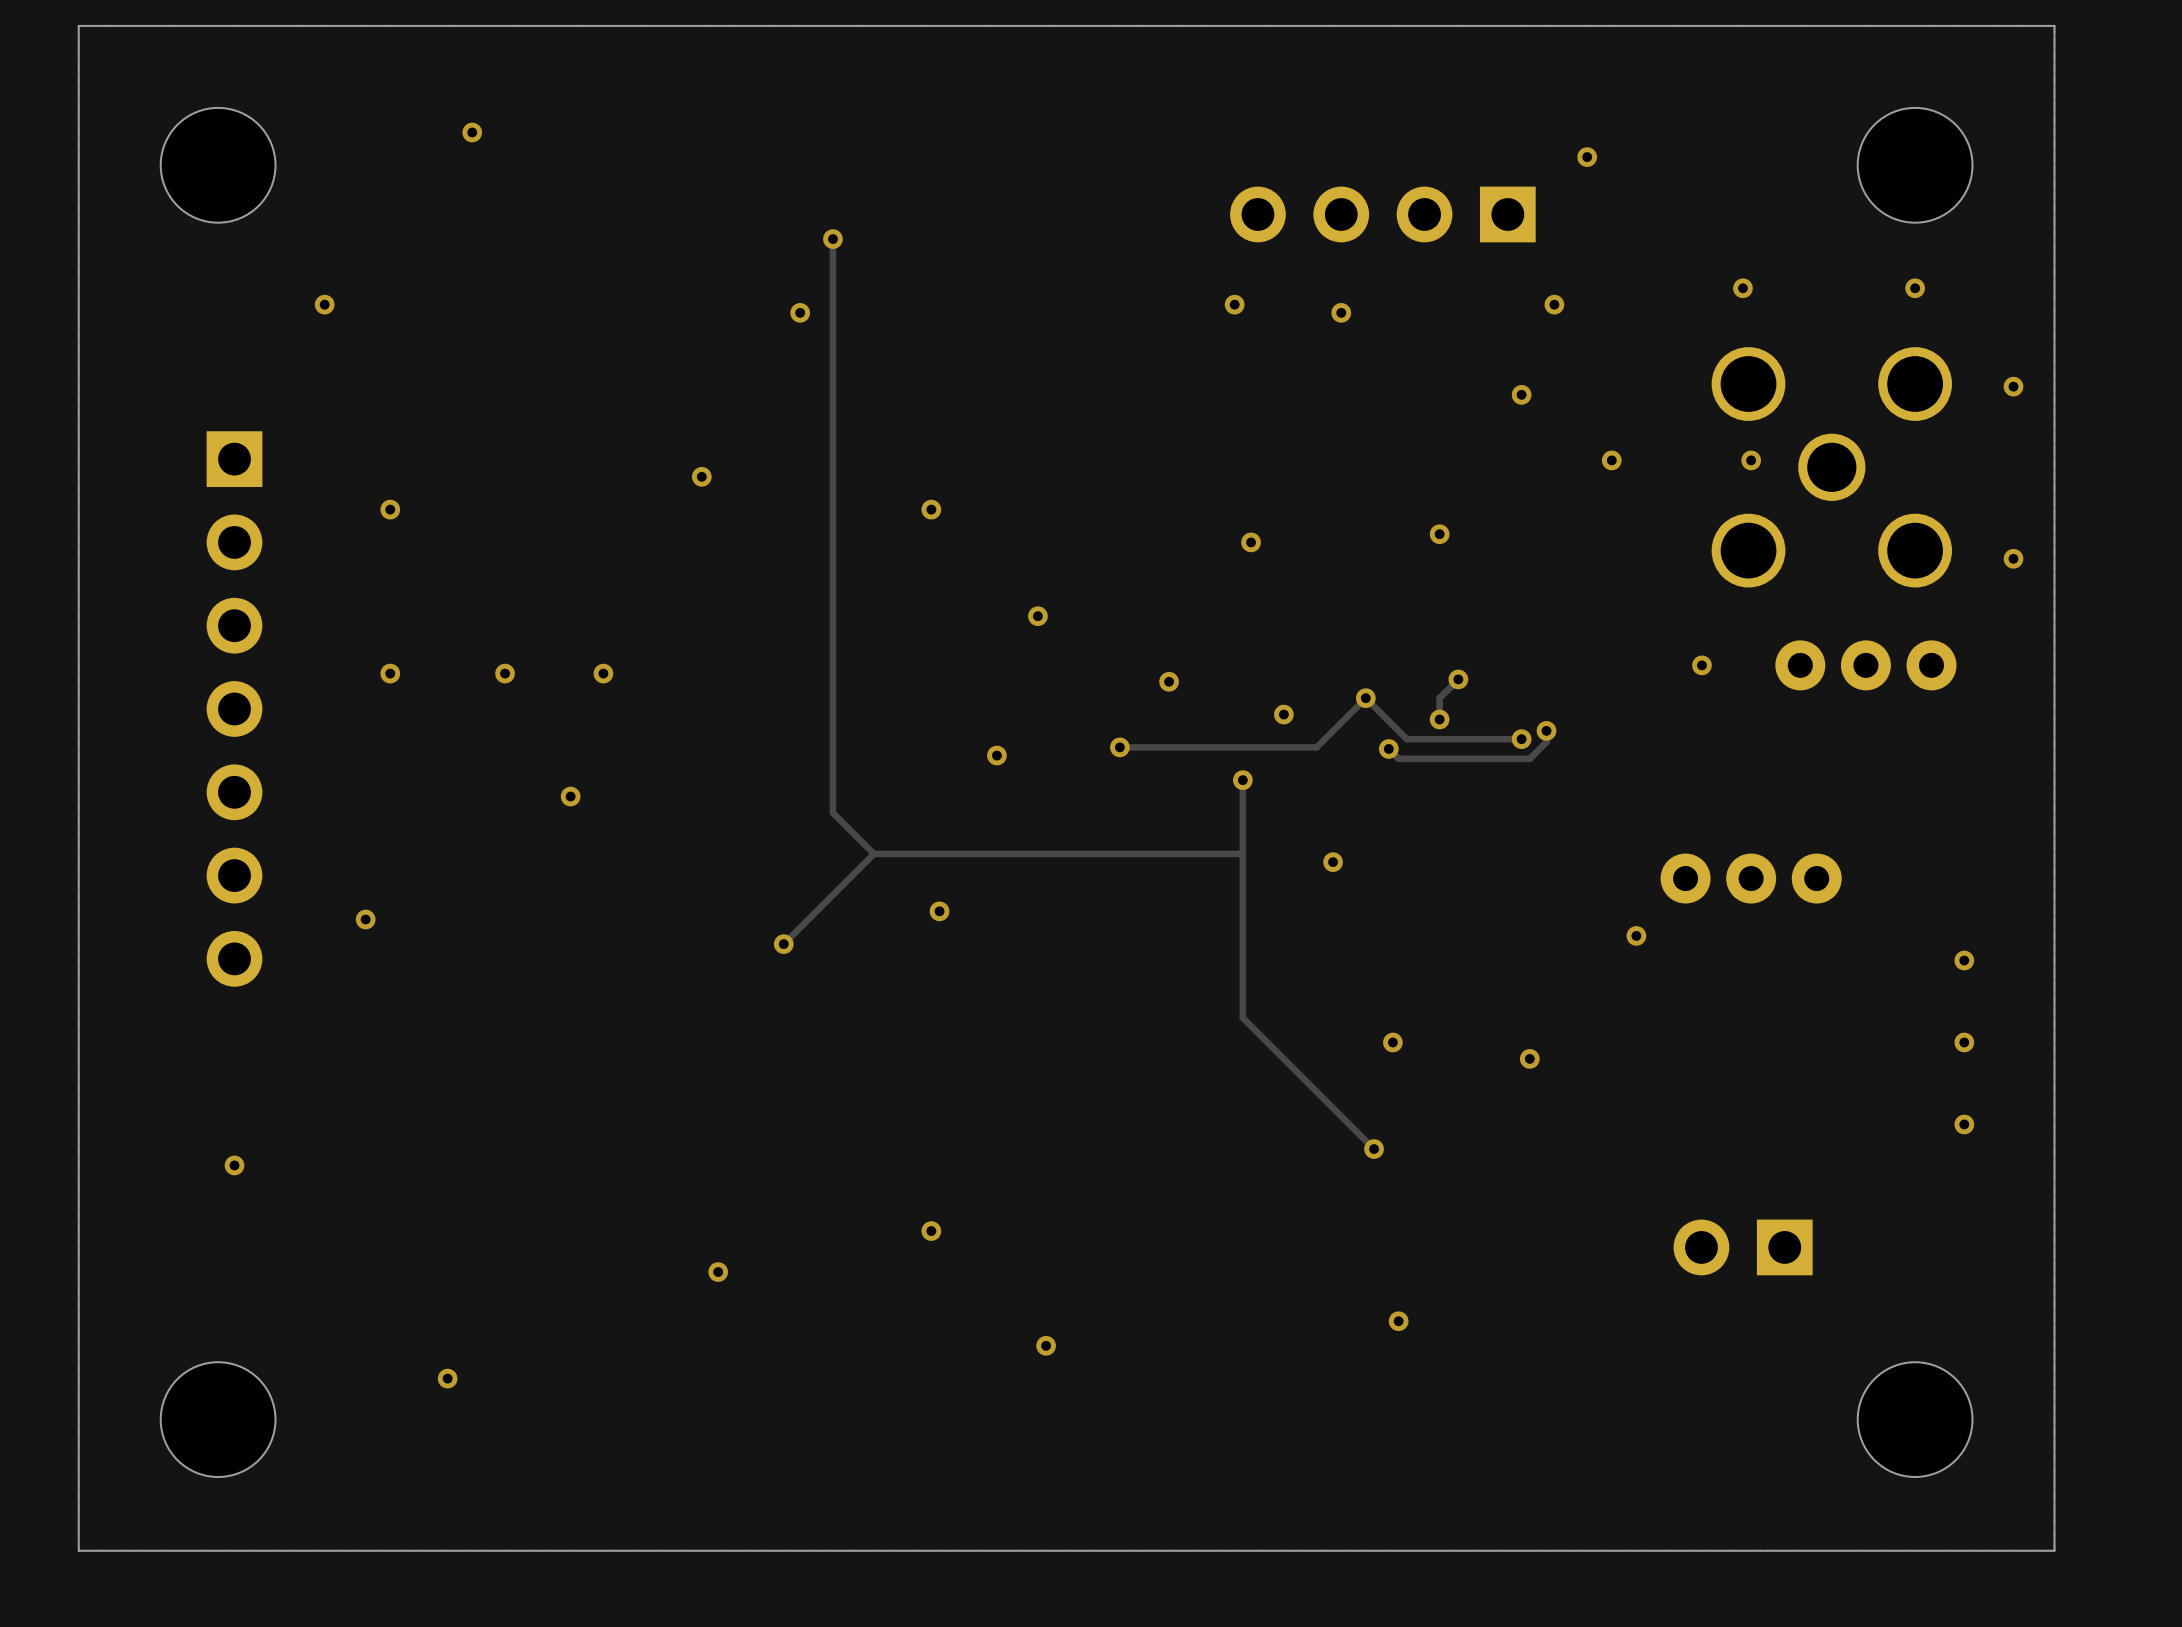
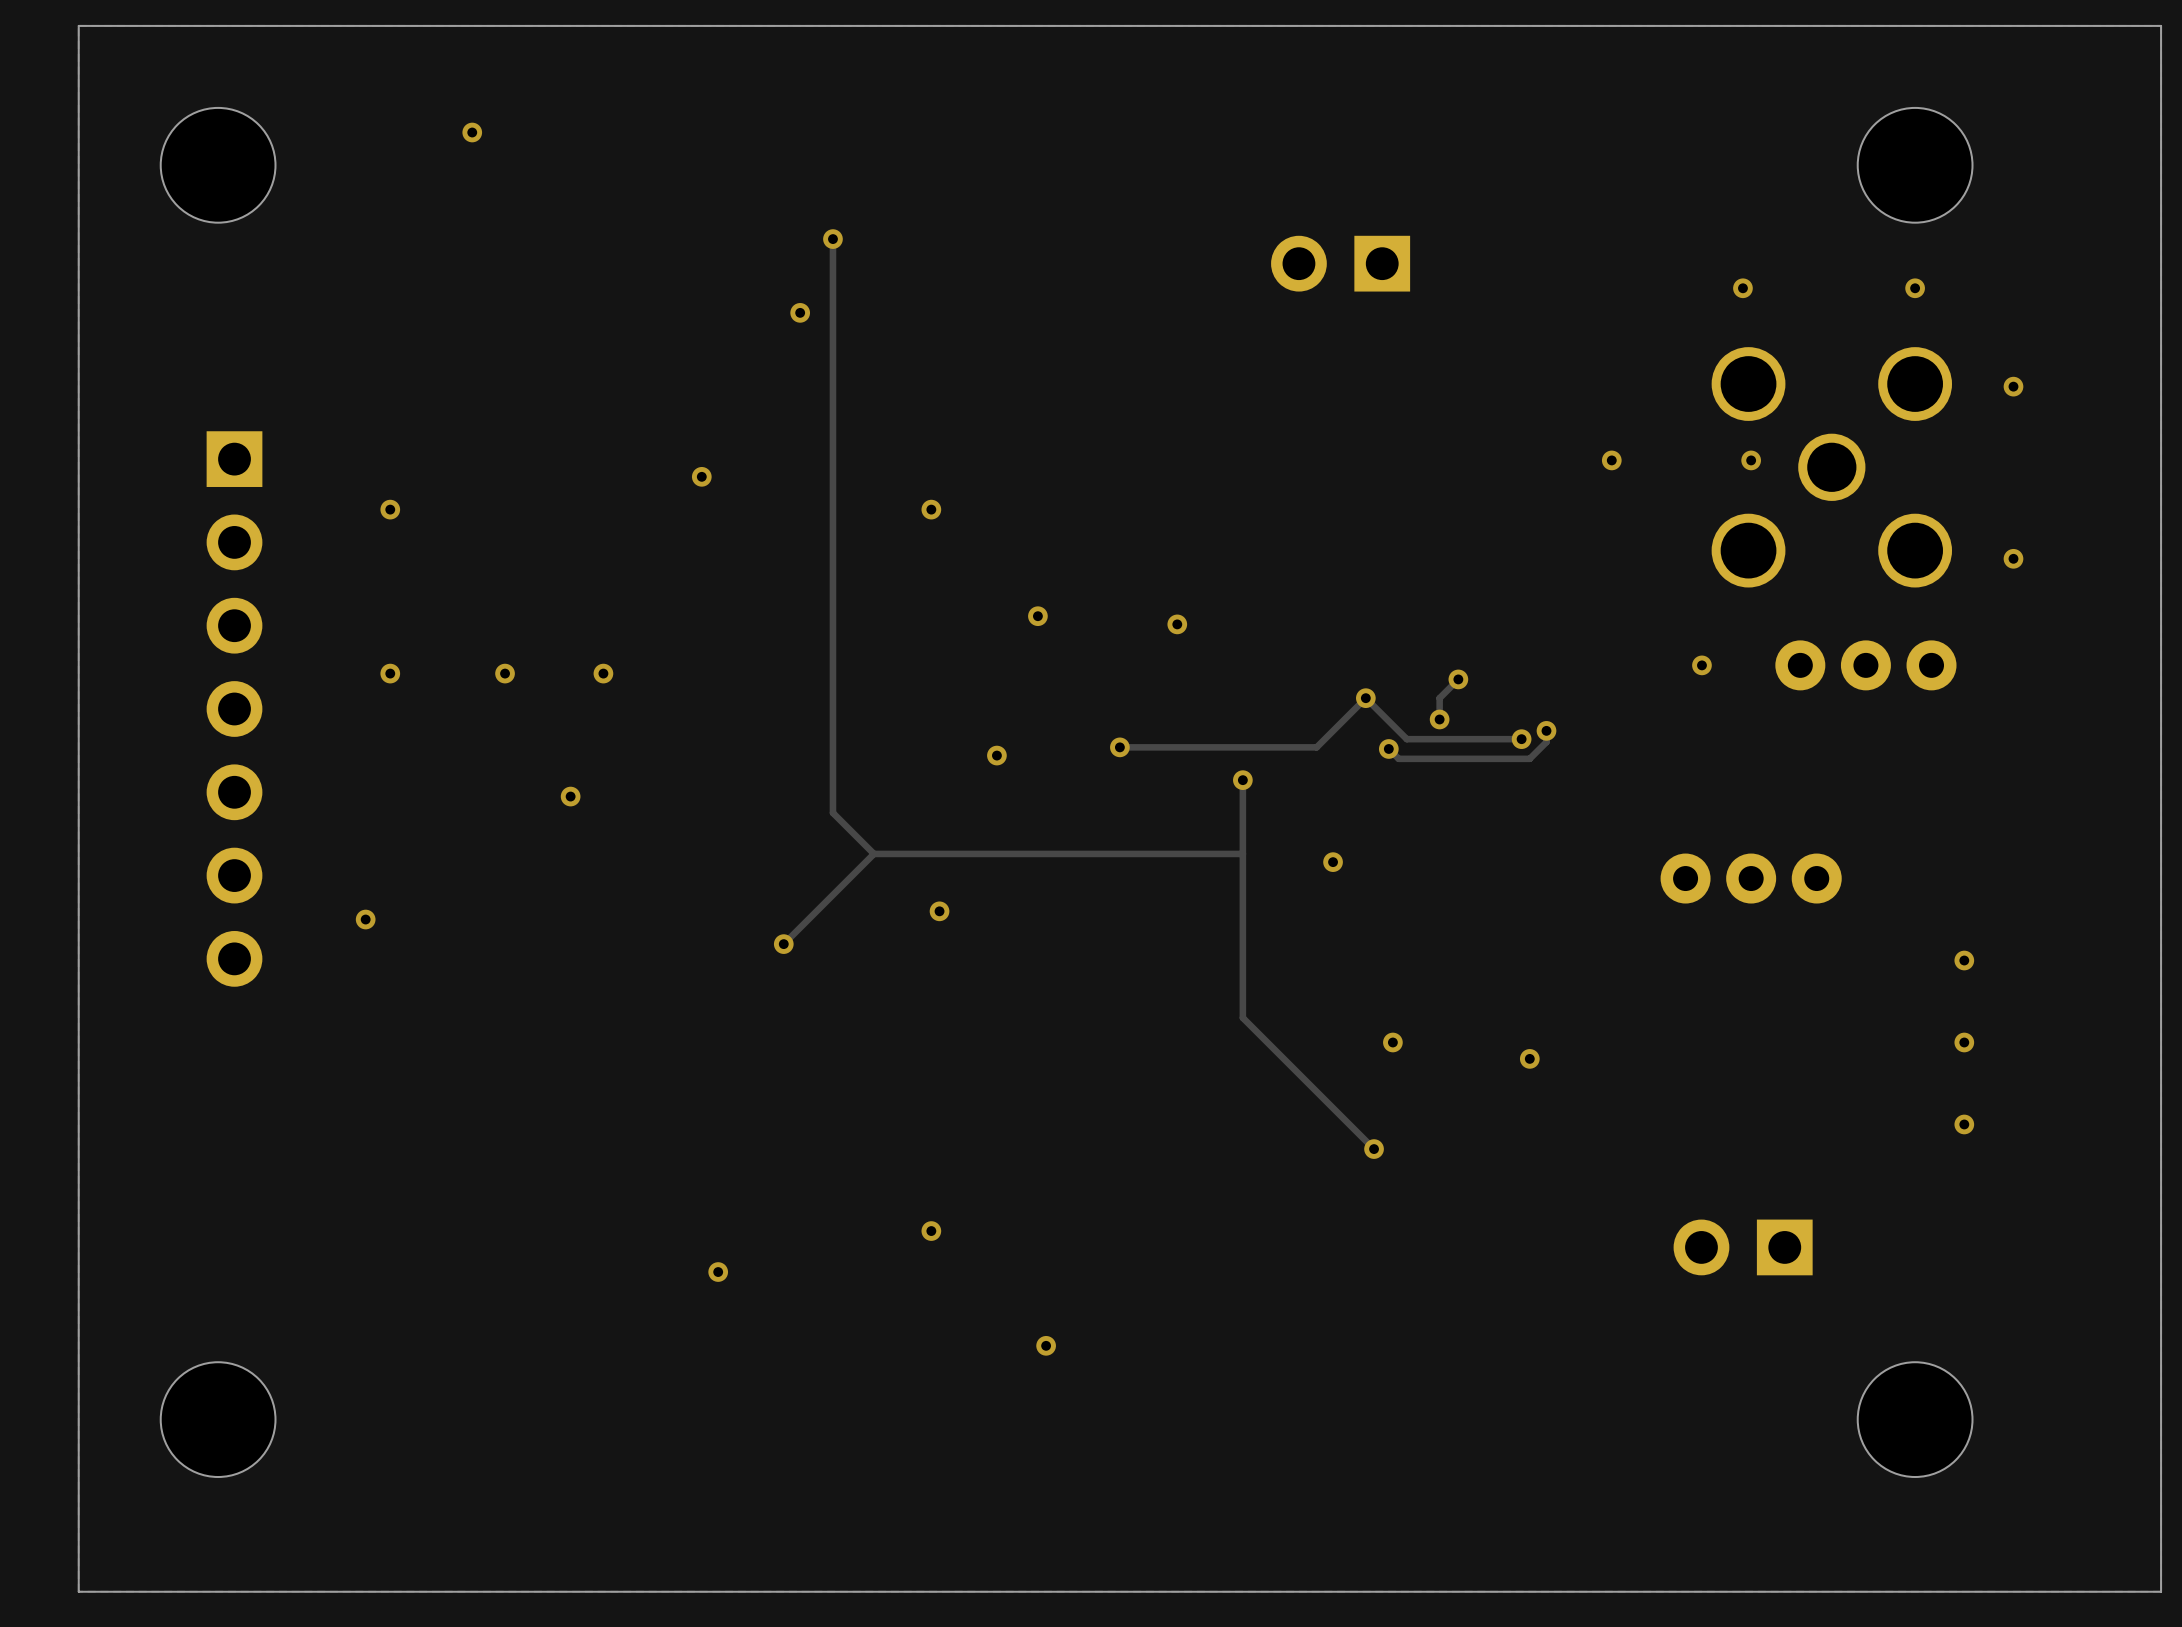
board edge: (2054, 25) (2054, 1550) (78, 1550) -> (2054, 25) (2161, 25) (2161, 1591) (78, 1591) (78, 1550)
via: (1587, 157) -> none
part: (1382, 214) -> none
part: none -> (1340, 263)
via: (324, 304) -> none
via: (1234, 304) -> none
via: (1554, 304) -> none
via: (1341, 312) -> none
via: (1521, 394) -> none
via: (1439, 534) -> none
via: (1251, 542) -> none
via: none -> (1177, 624)
via: (1169, 681) -> none
via: (1283, 714) -> none
via: (1636, 935) -> none
via: (234, 1165) -> none
via: (1398, 1321) -> none
via: (447, 1378) -> none

